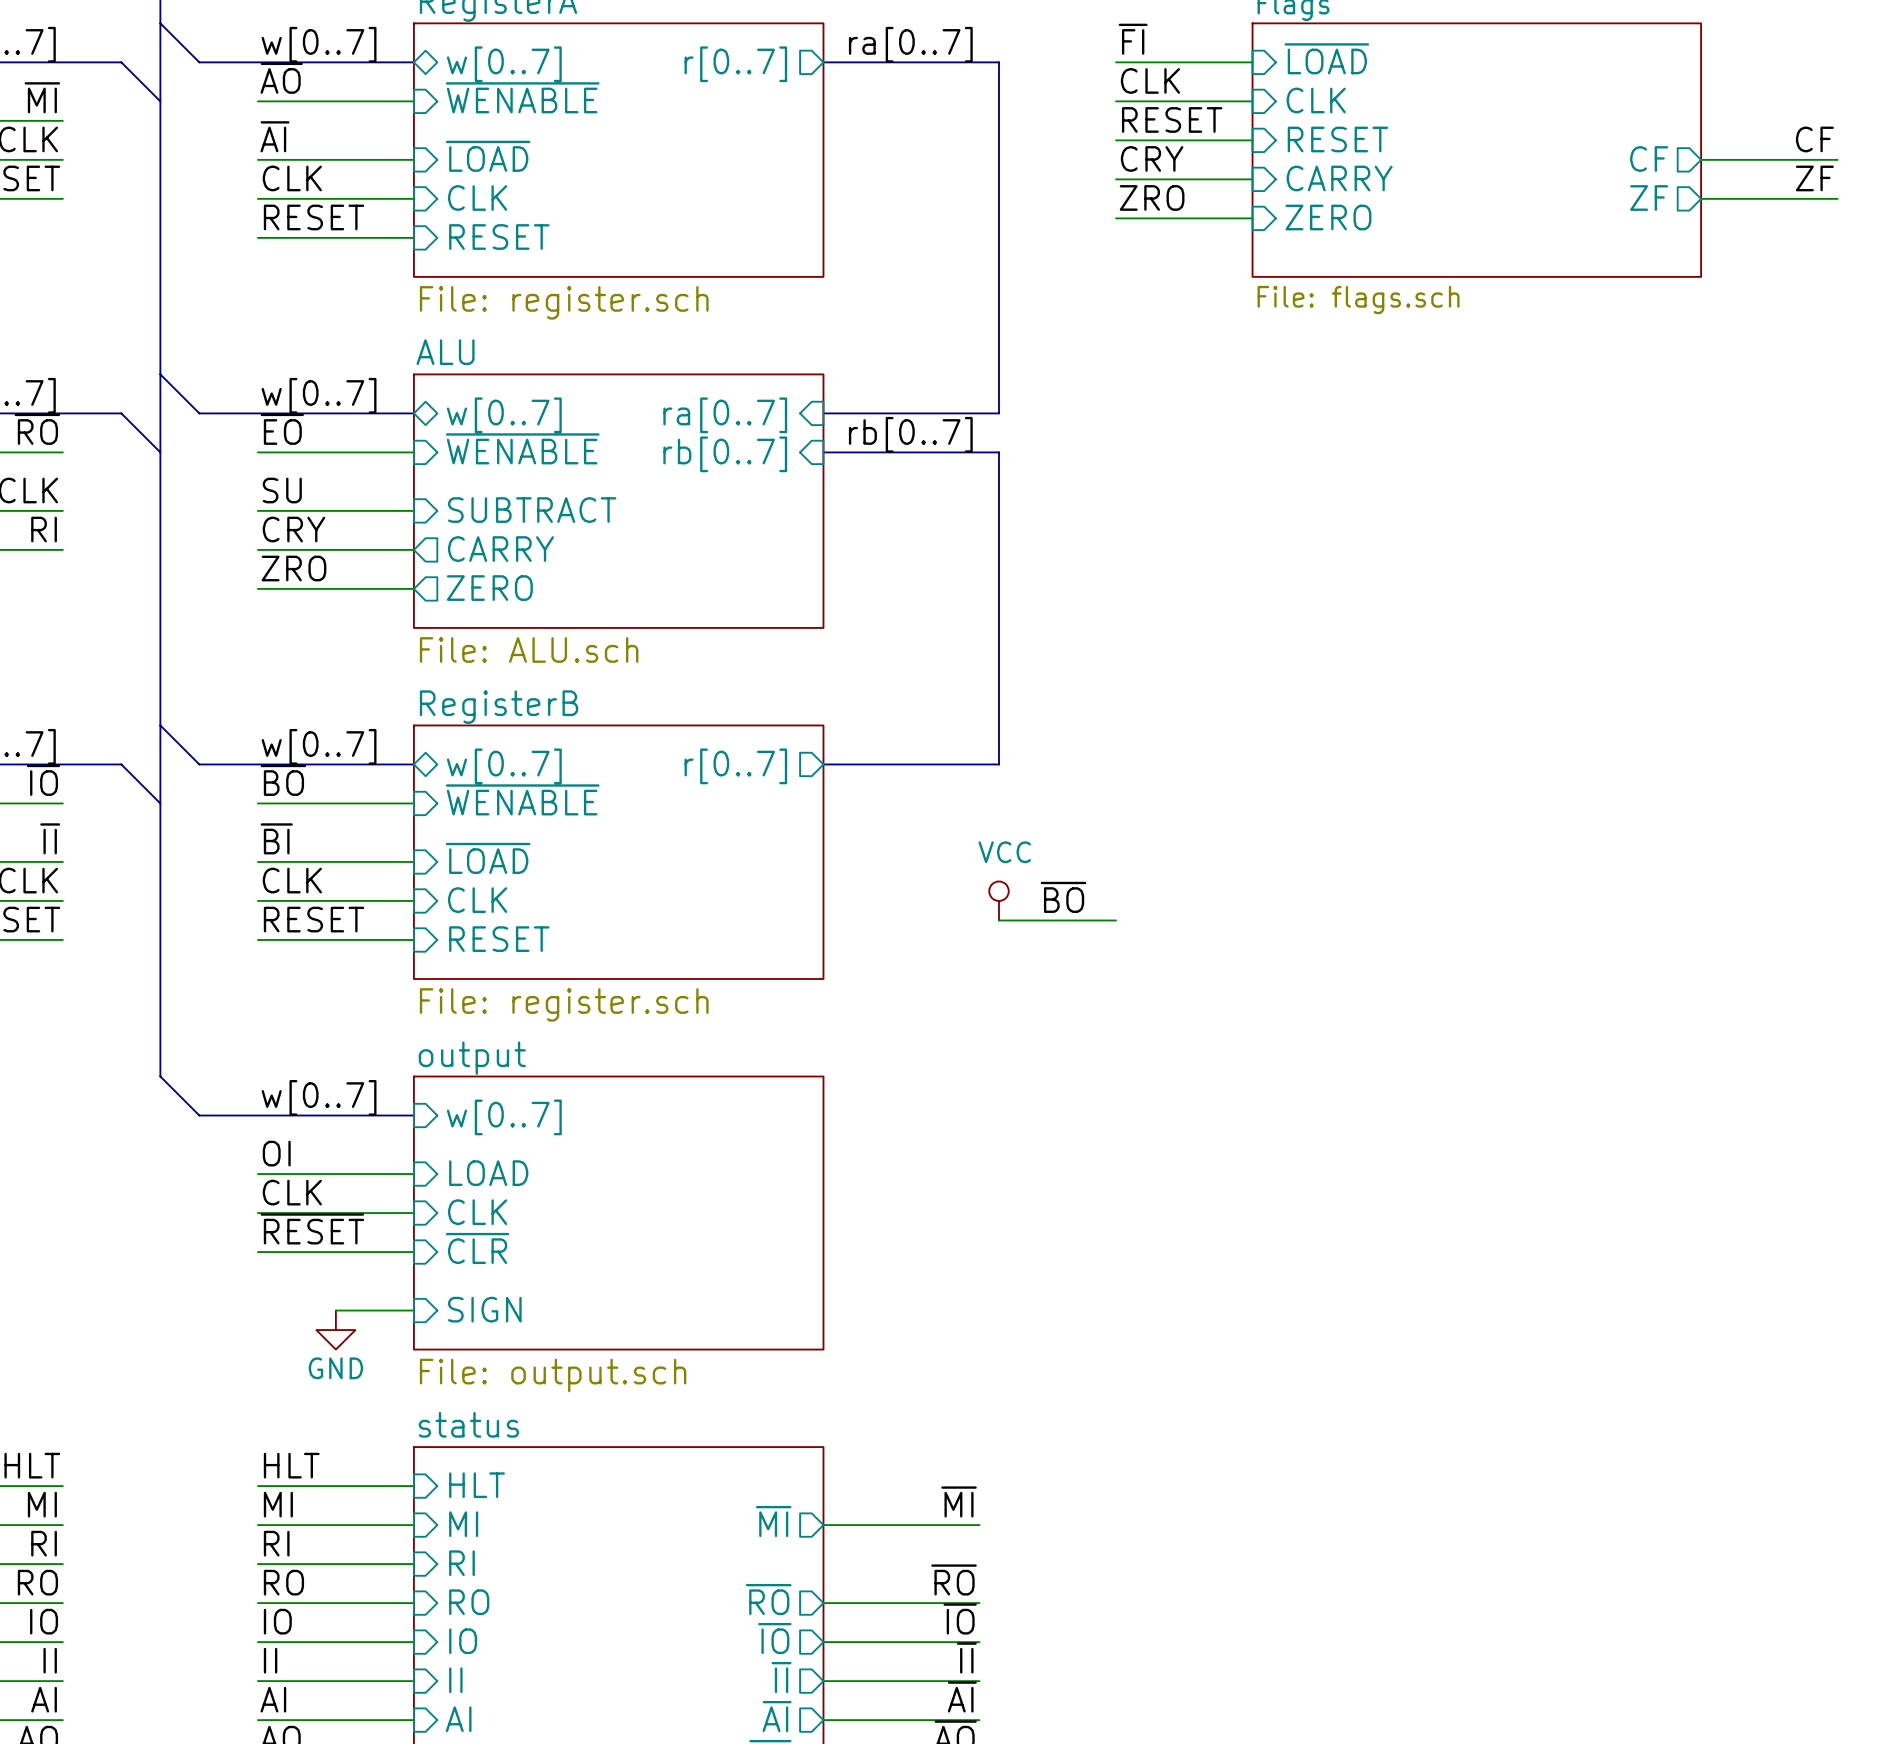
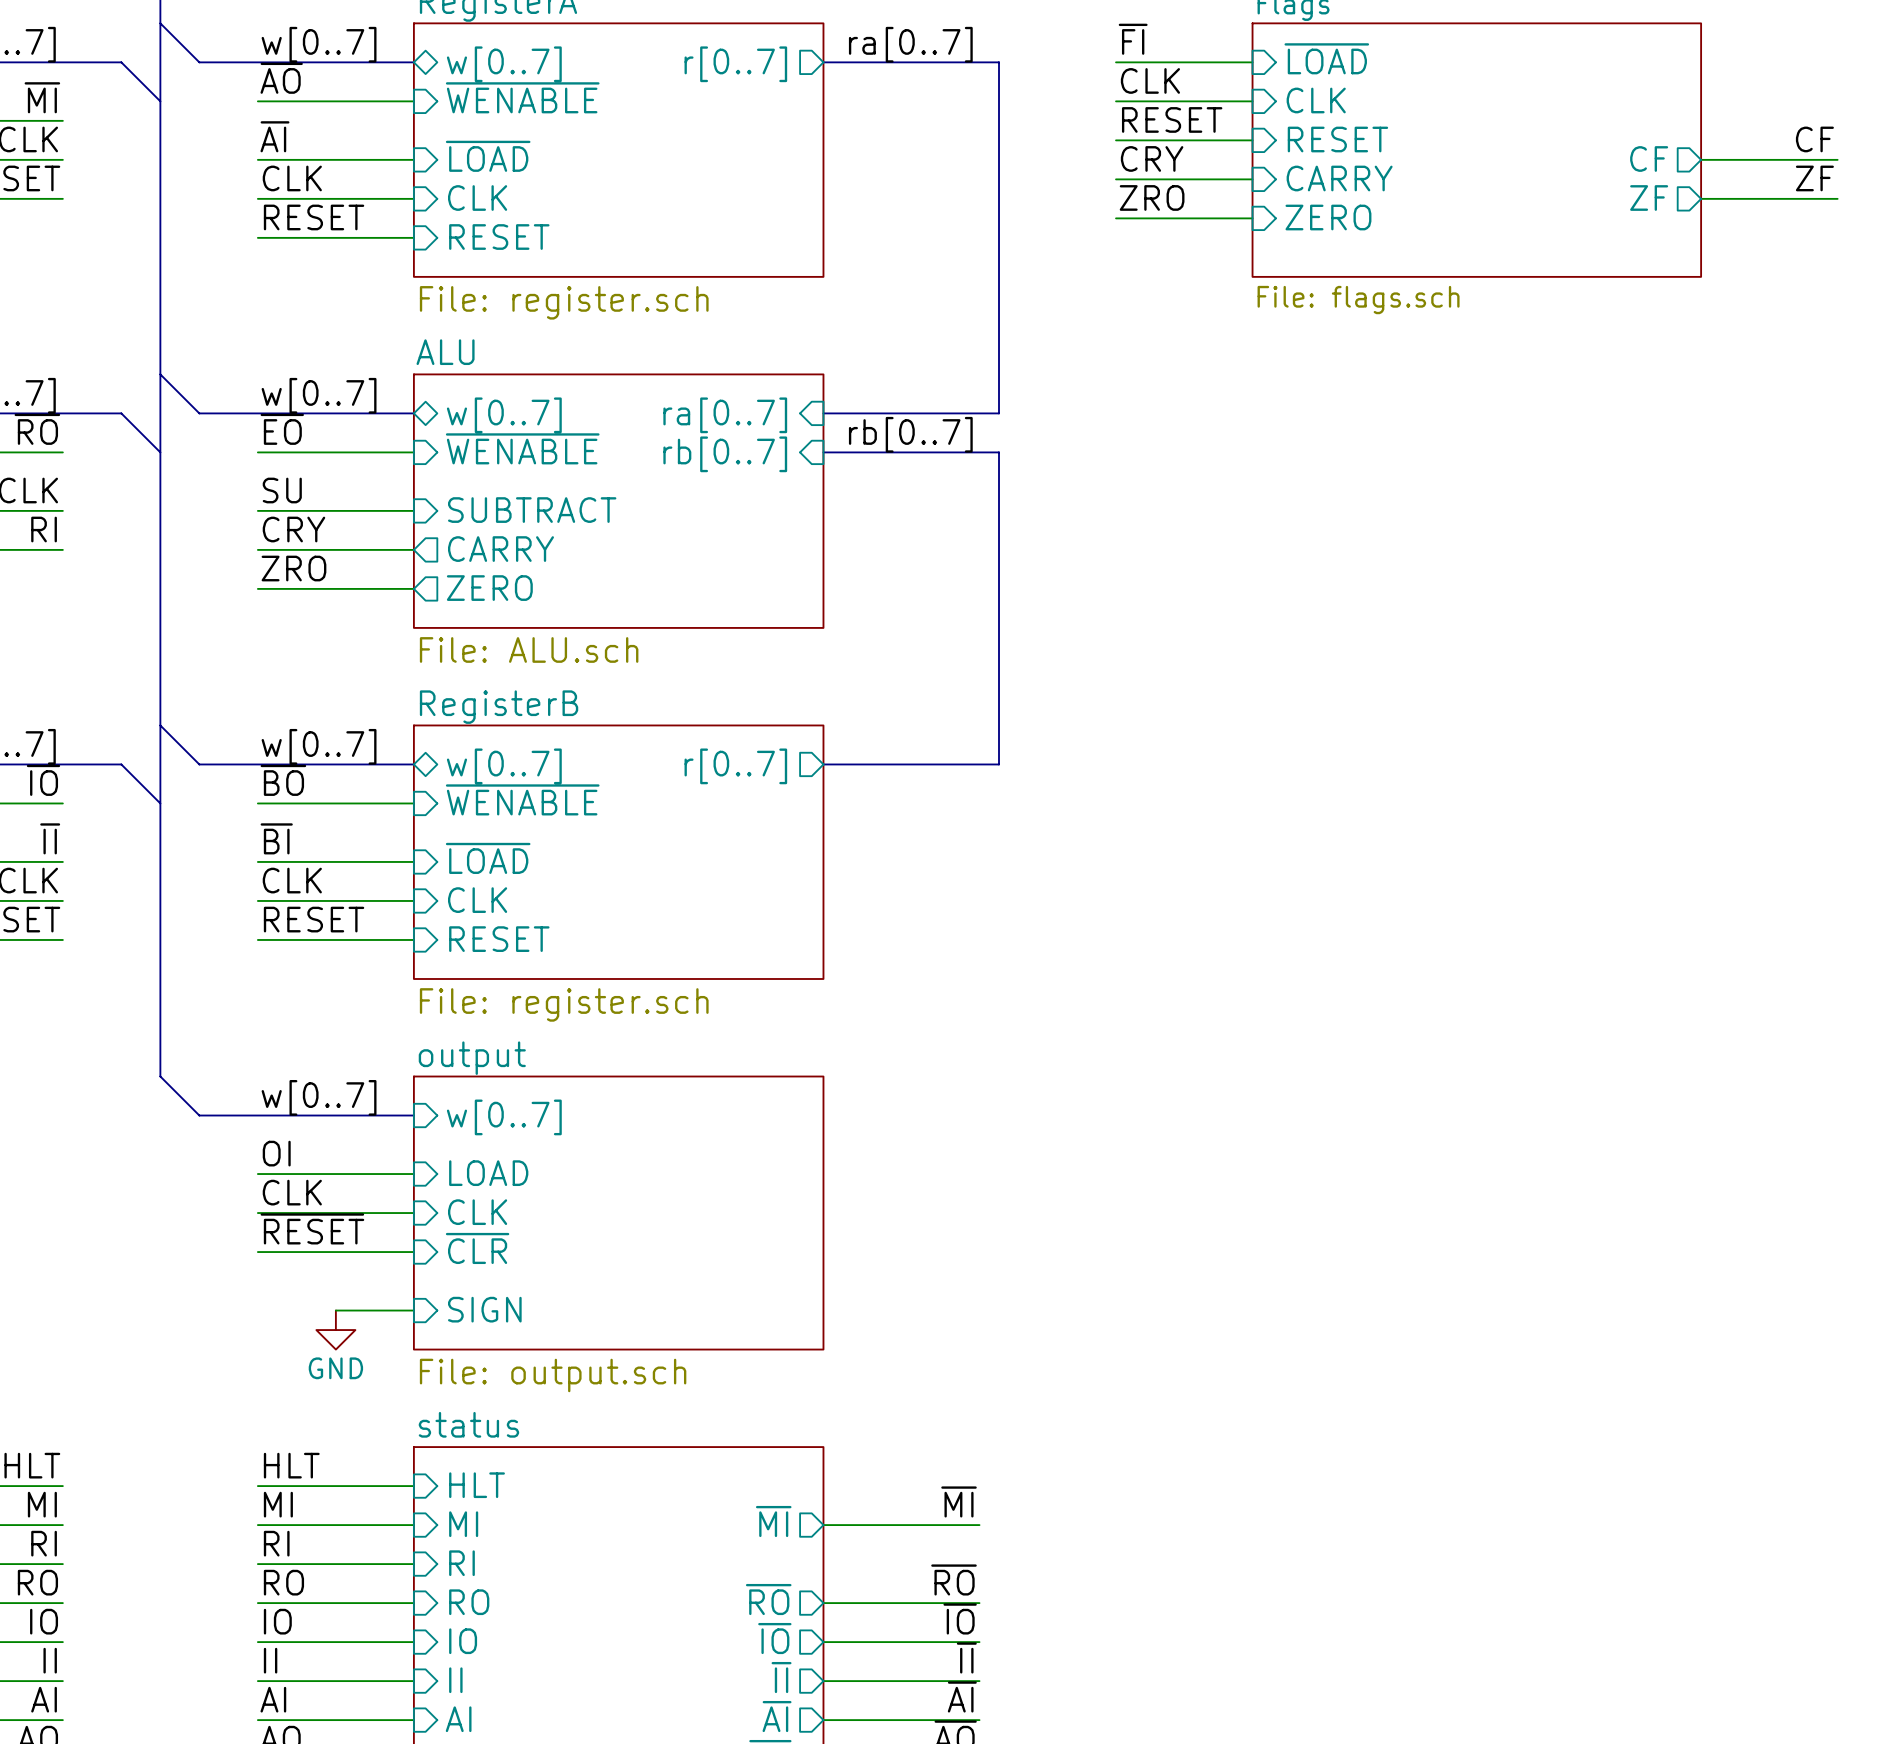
label: ~{BO} (1063, 897) -> none
power symbol: VCC (999, 900) -> none
wire: (999, 920) (1116, 920) -> none

